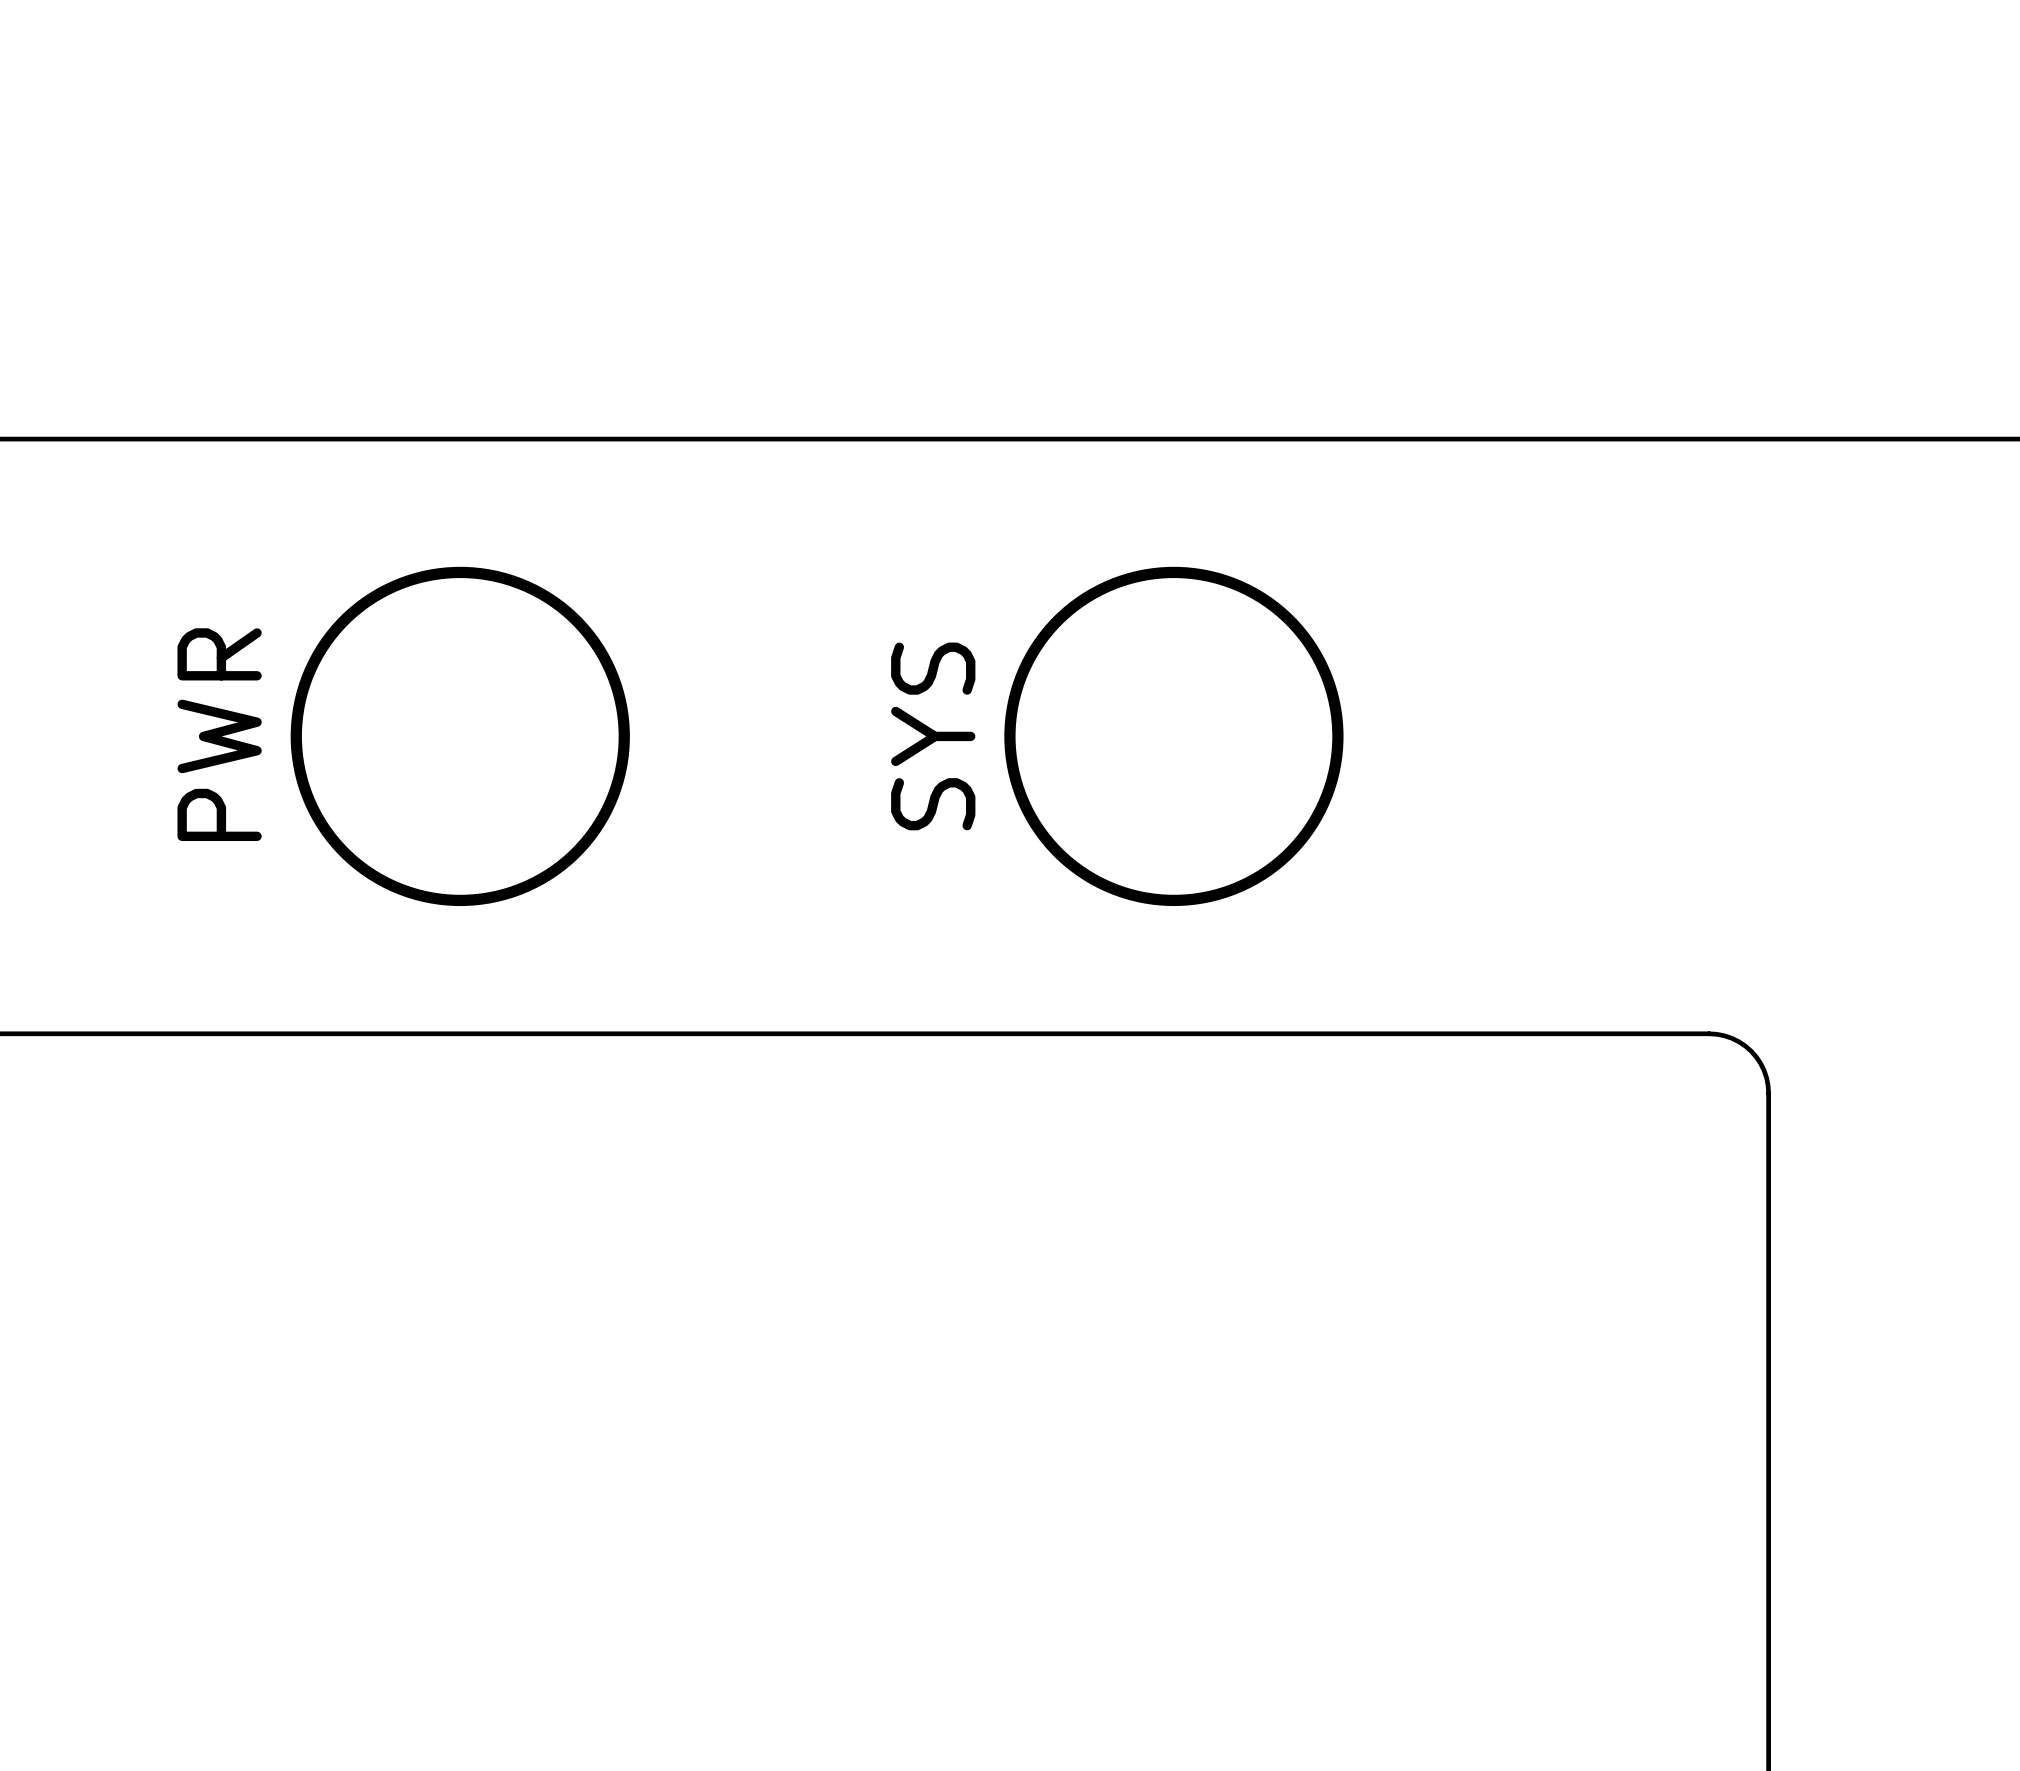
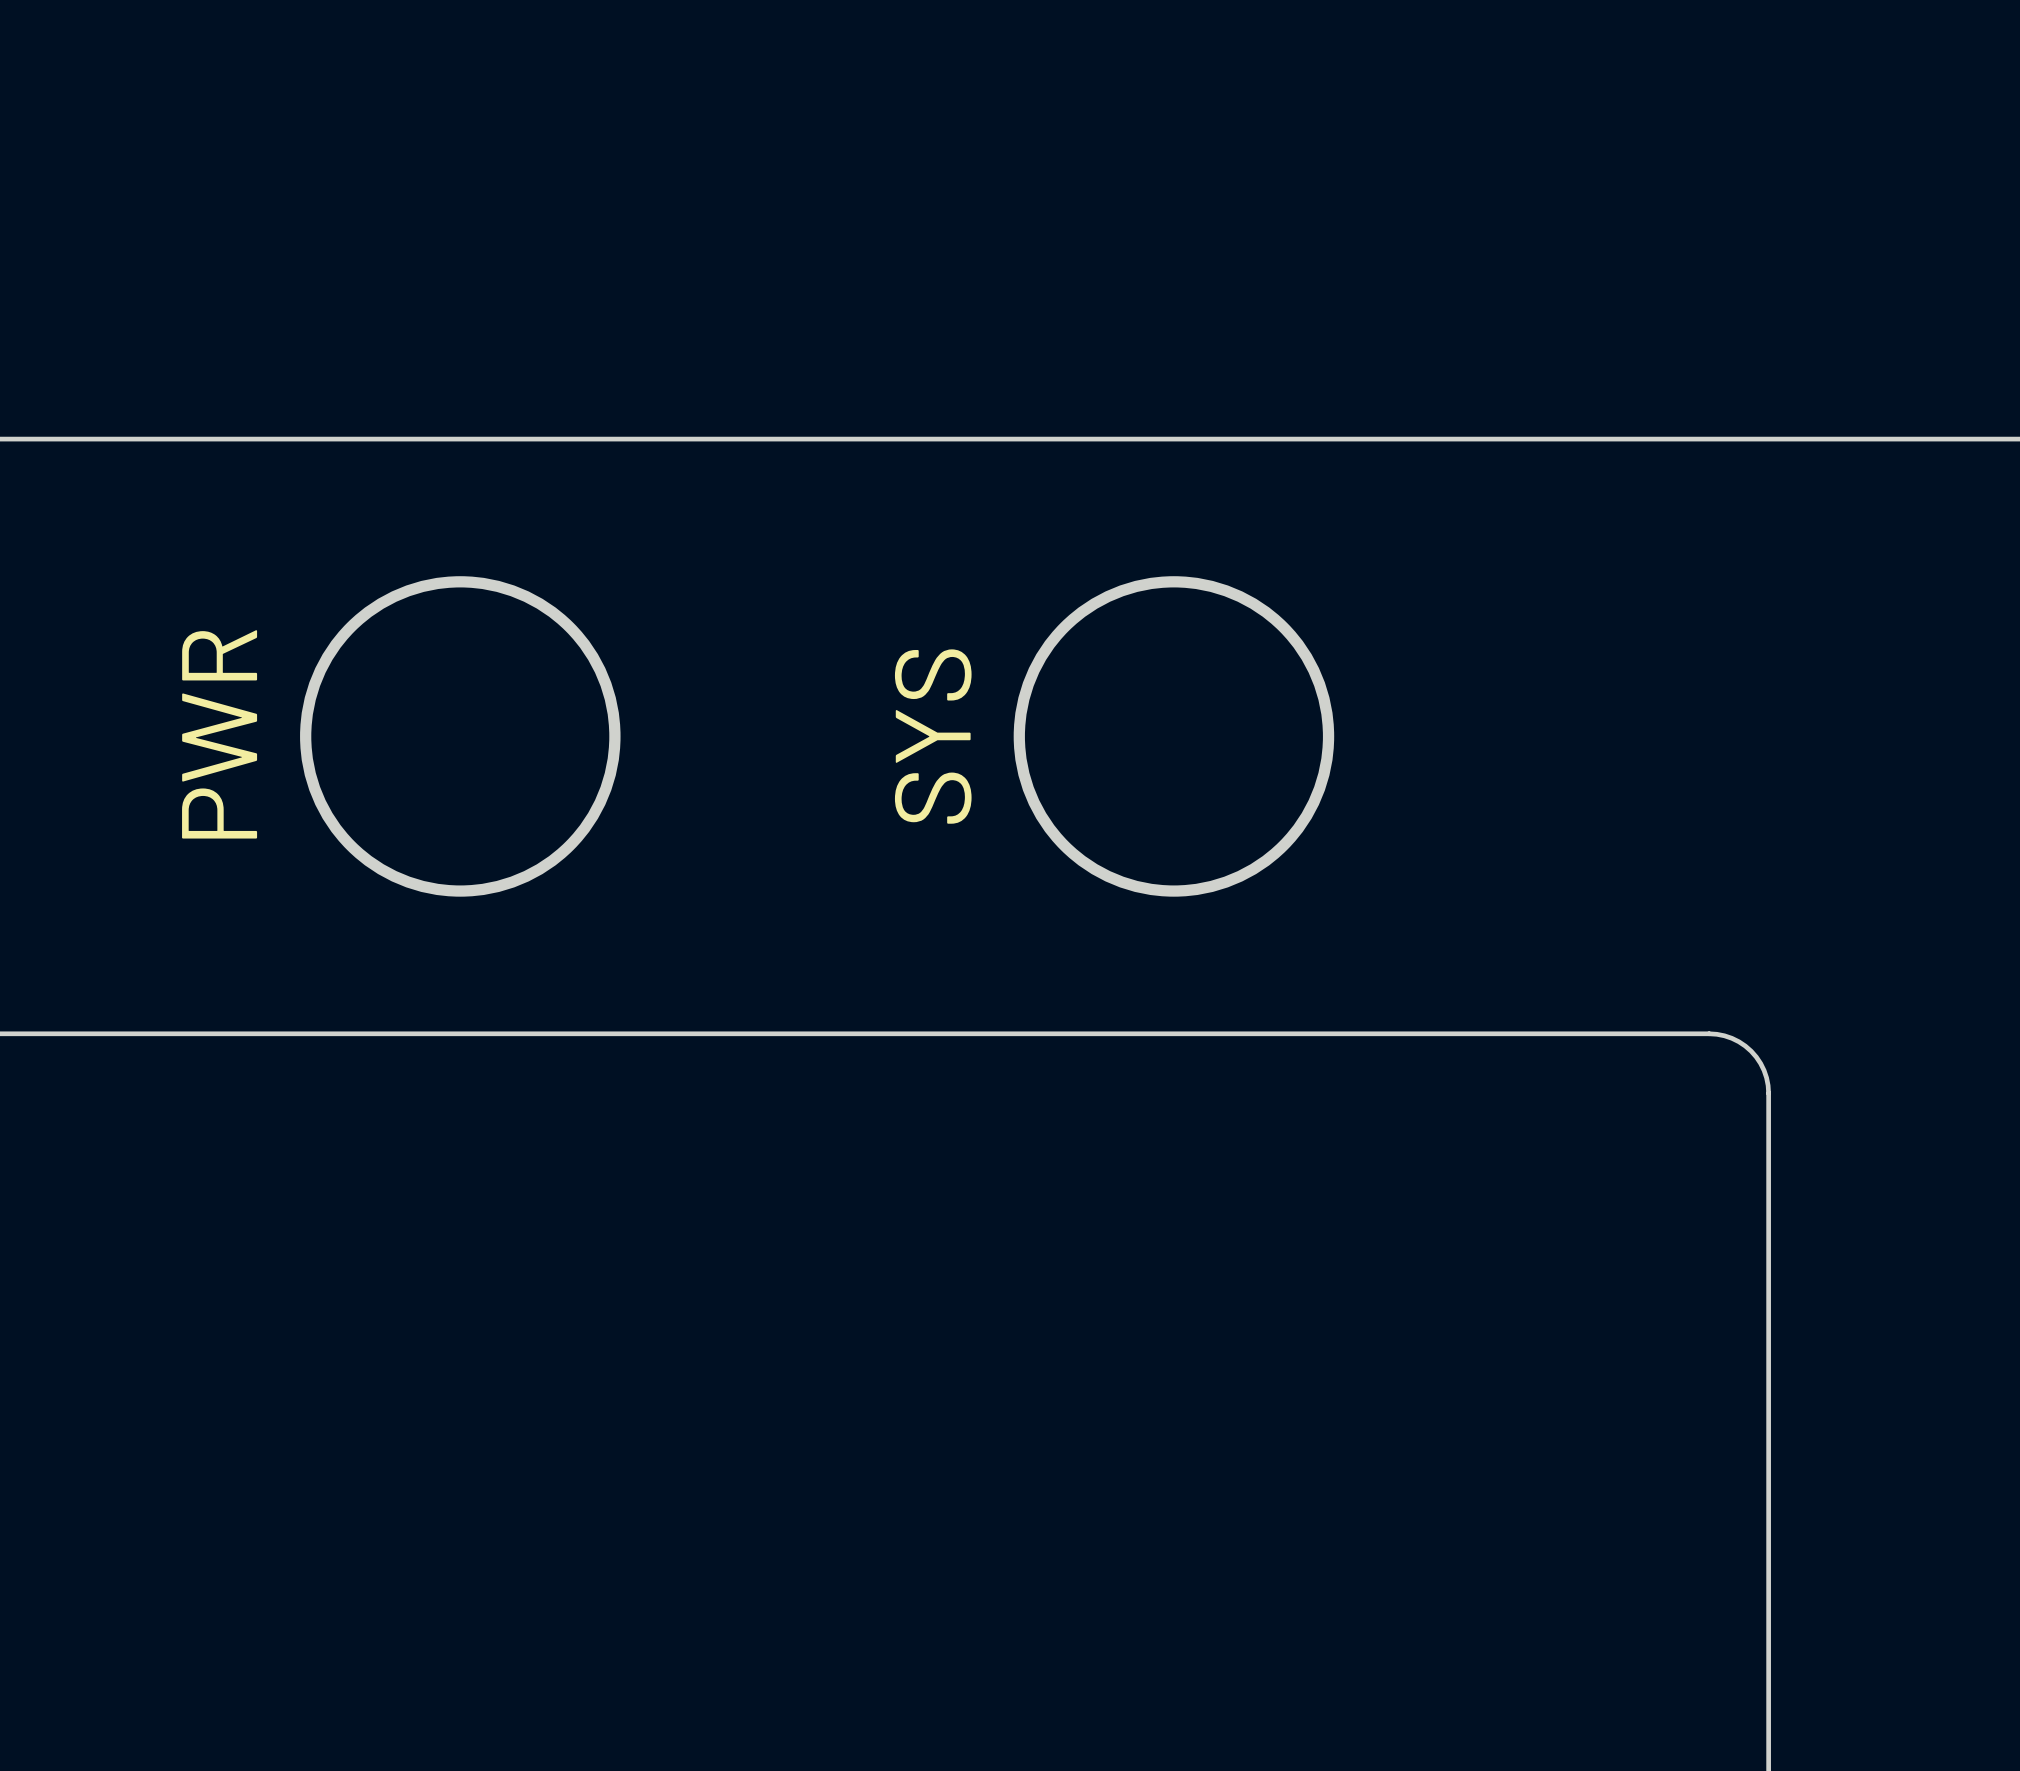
round board edge size: [290, 566, 630, 907] -> [300, 576, 621, 897]
round board edge size: [1004, 566, 1344, 907] -> [1013, 576, 1335, 897]

